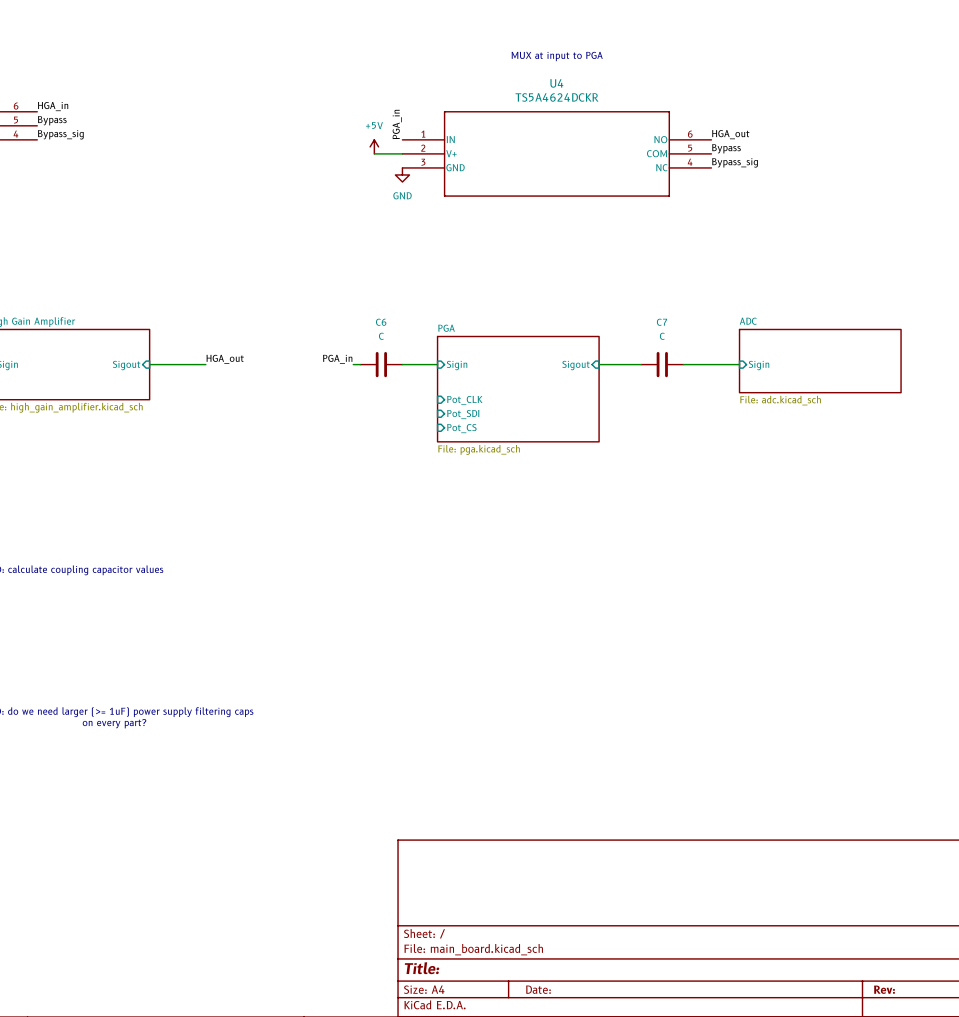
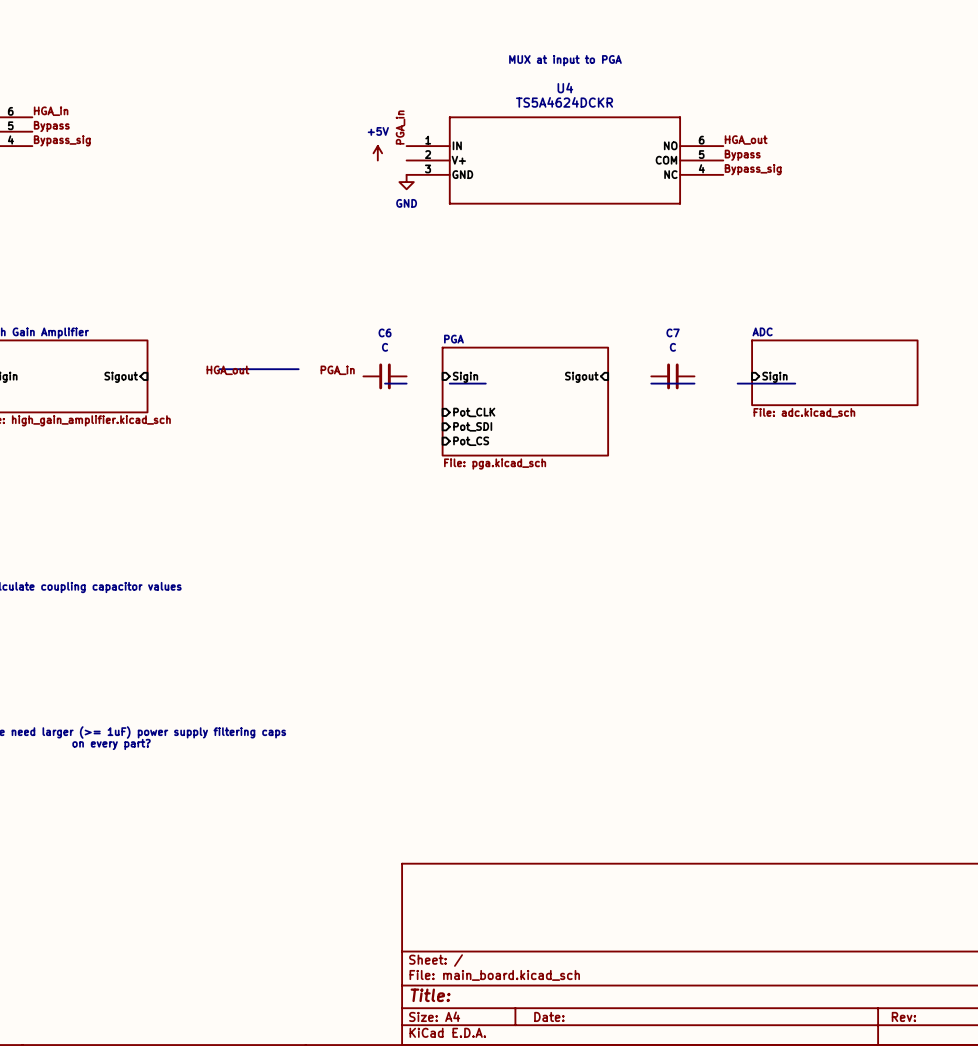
wire: (374, 153) (402, 153) -> none
wire: none -> (219, 369) (298, 369)
wire: (149, 364) (205, 364) -> none
wire: (353, 364) (360, 364) -> none
wire: (402, 364) (437, 364) -> (449, 383) (485, 383)
wire: (599, 364) (641, 364) -> (651, 383) (694, 383)
wire: (683, 364) (739, 364) -> (737, 383) (795, 383)
wire: none -> (385, 383) (406, 383)

